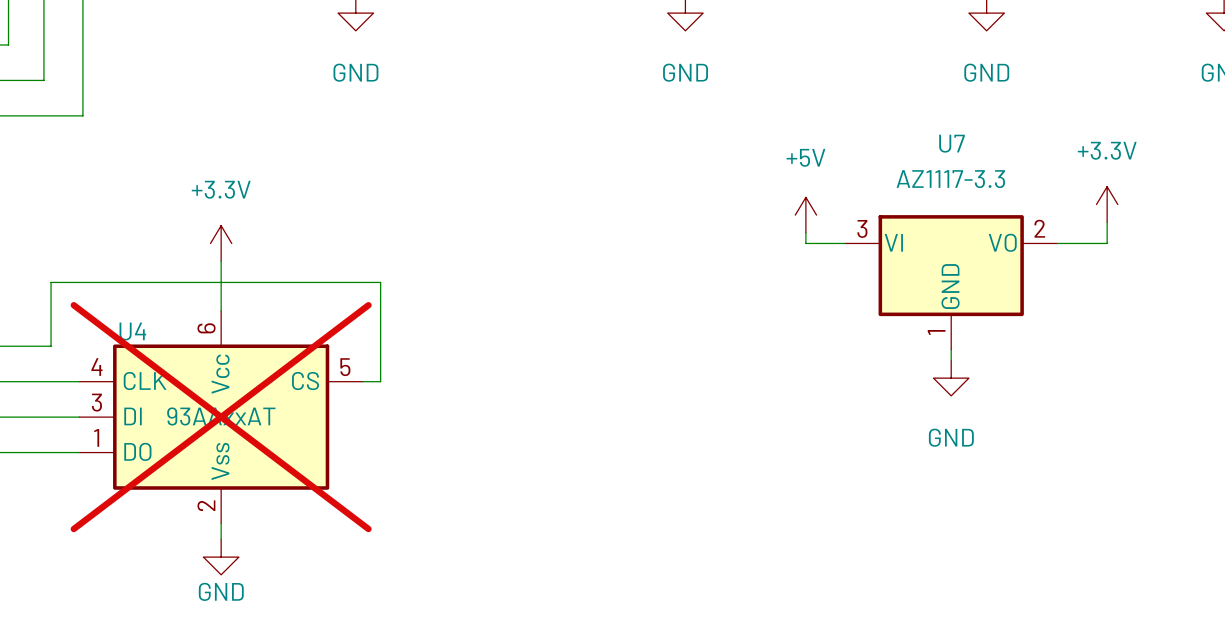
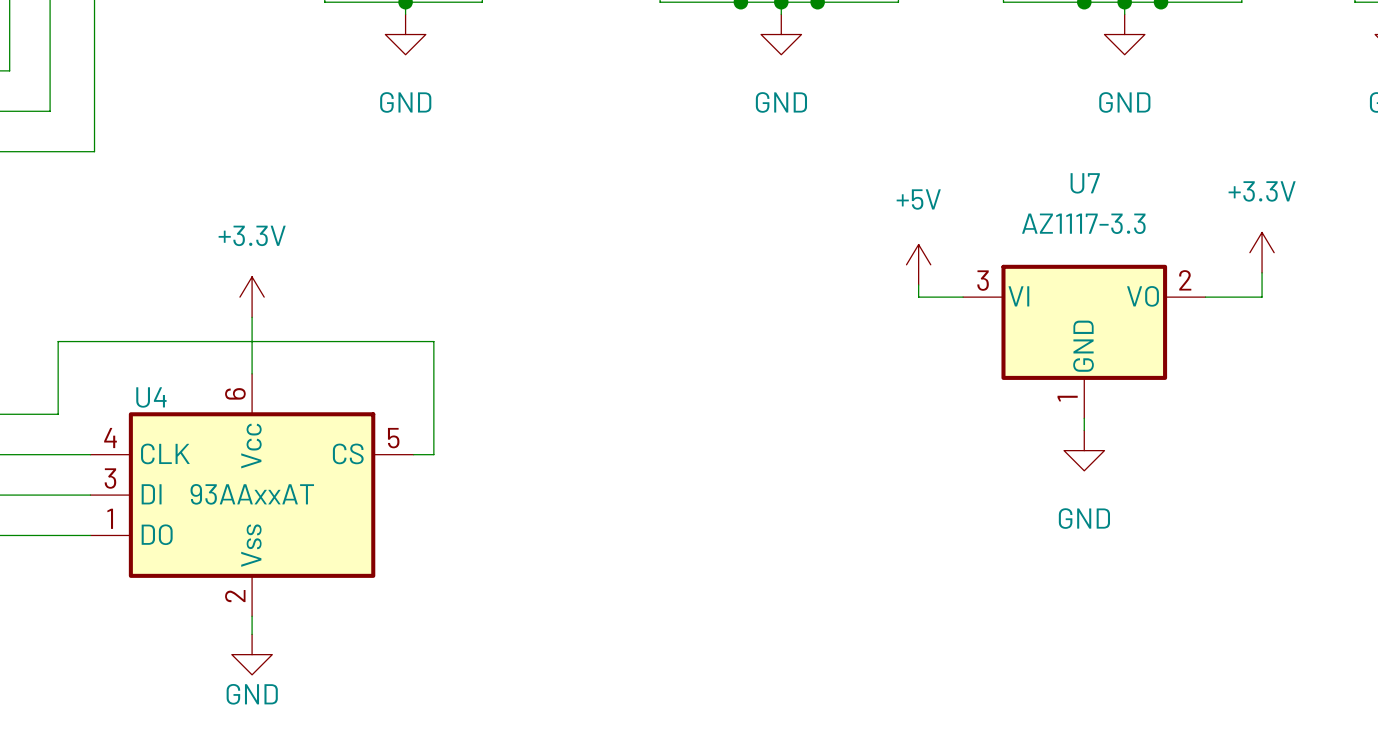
U4 do-not-place cross: (221, 417) -> none

